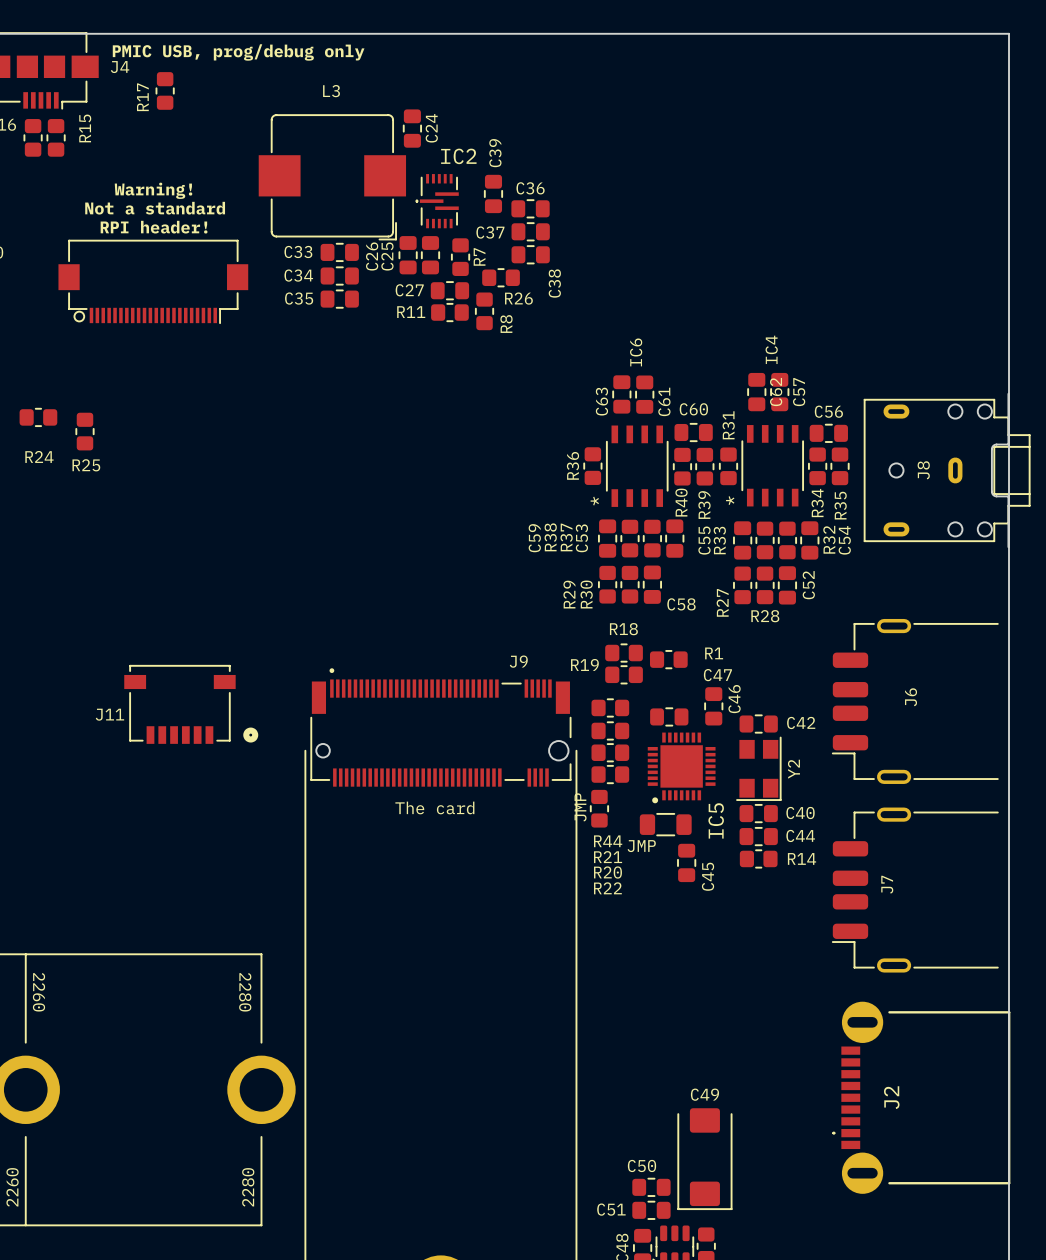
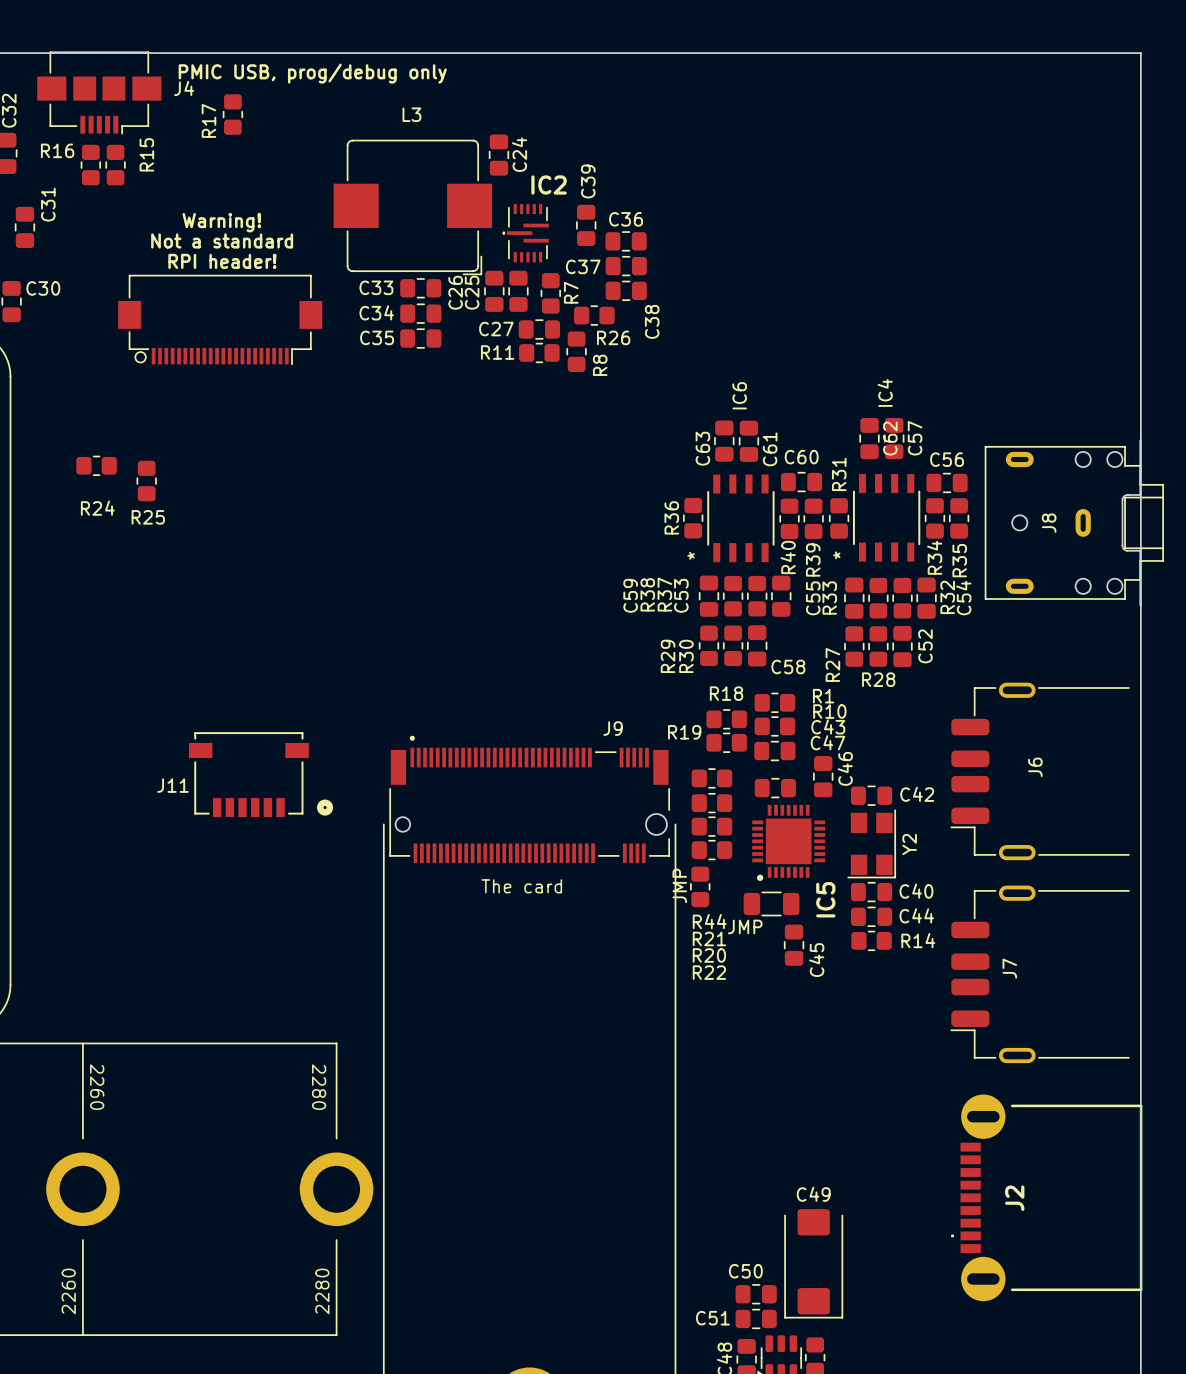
R1: none -> (774, 702)
R1 name: R1 (714, 653) -> R10 (829, 711)
C43: none -> (774, 751)

